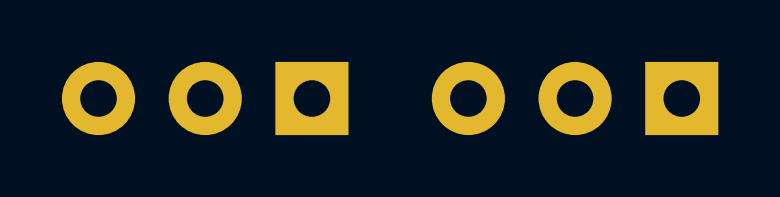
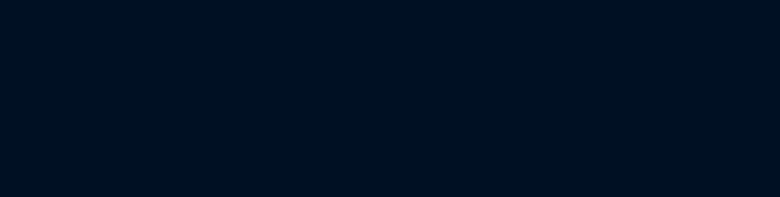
part: (205, 98) -> none
part: (575, 98) -> none

